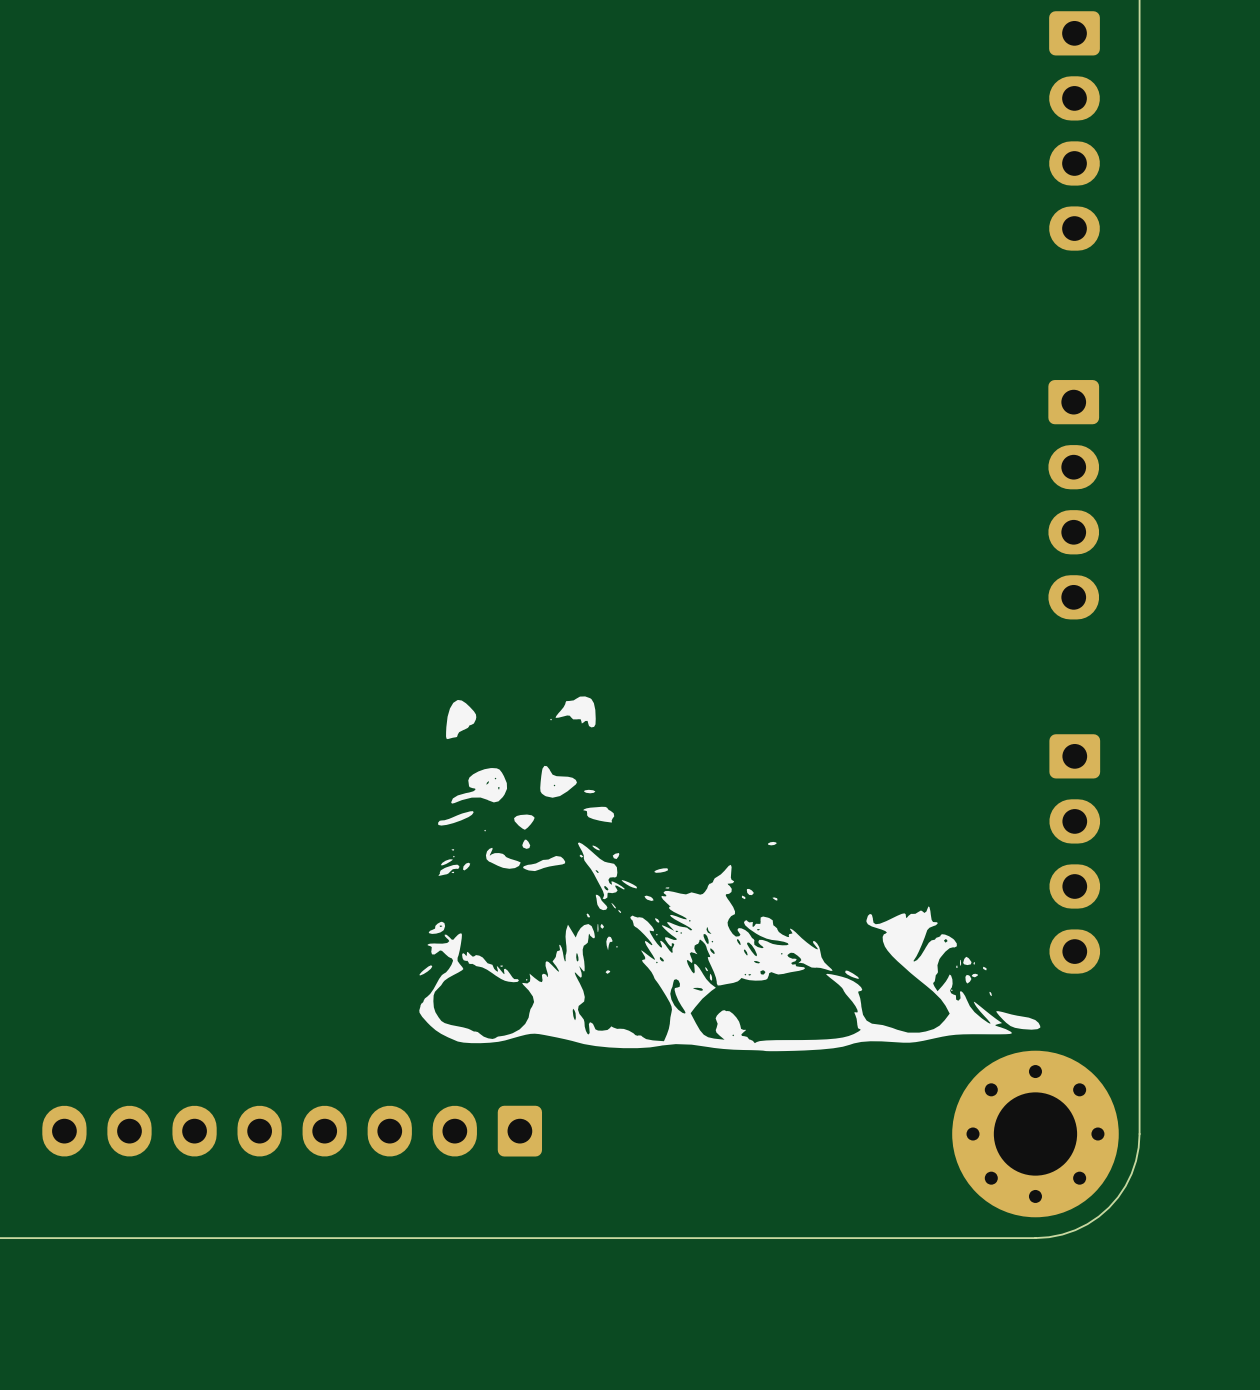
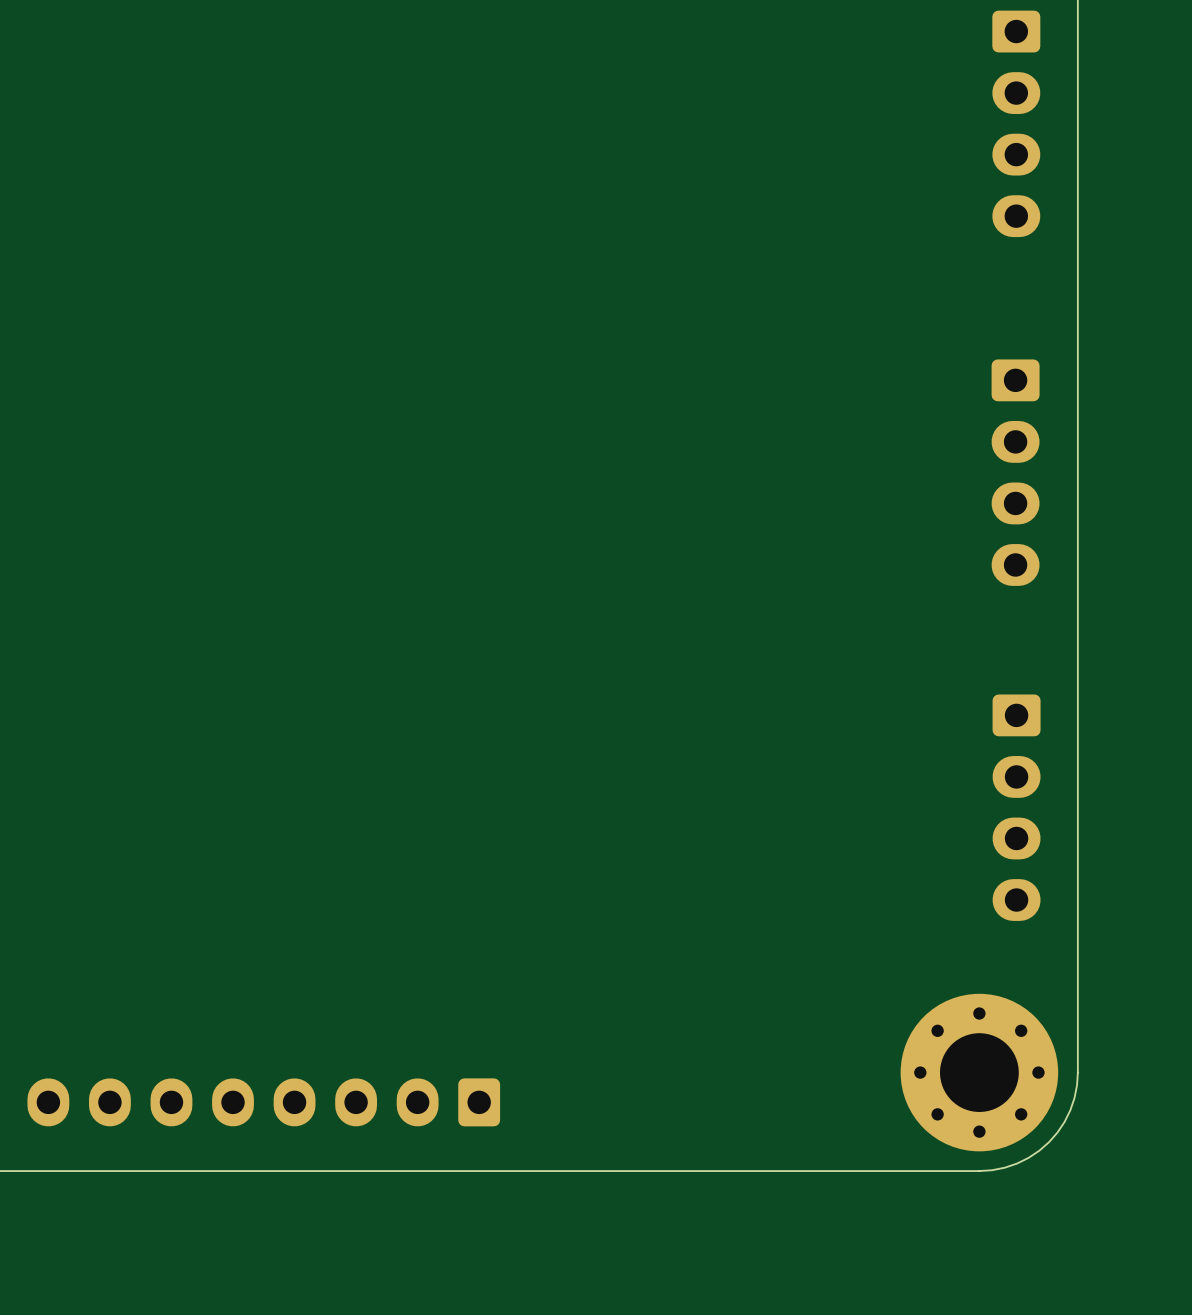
drawing: [419, 696, 1041, 1052] -> none
part position: (292, 1131) -> (263, 1102)

